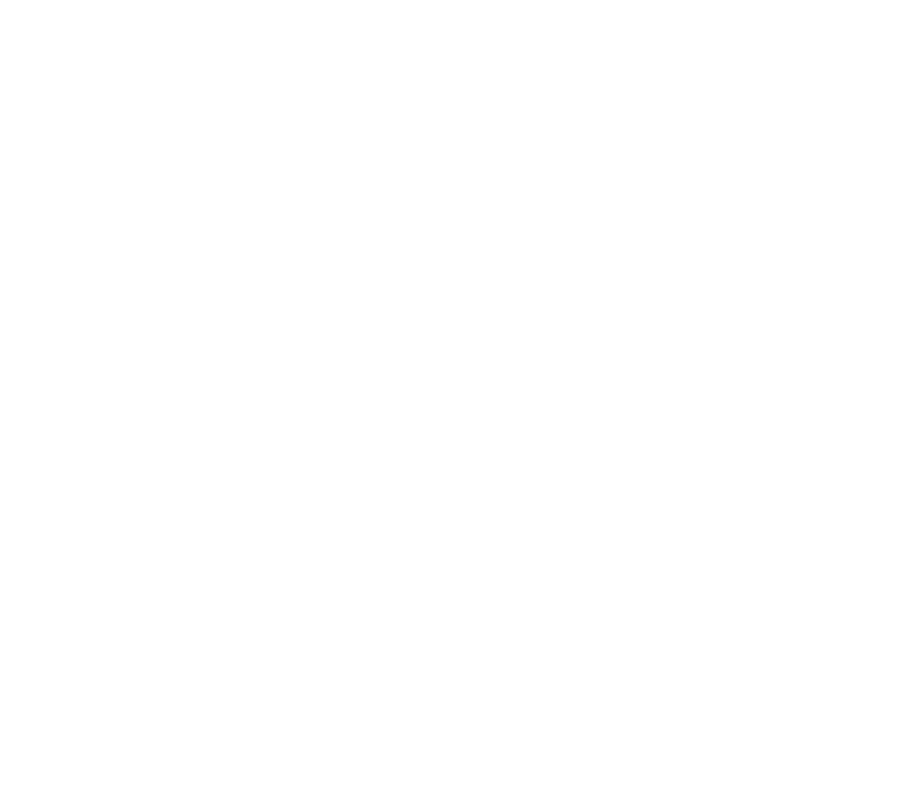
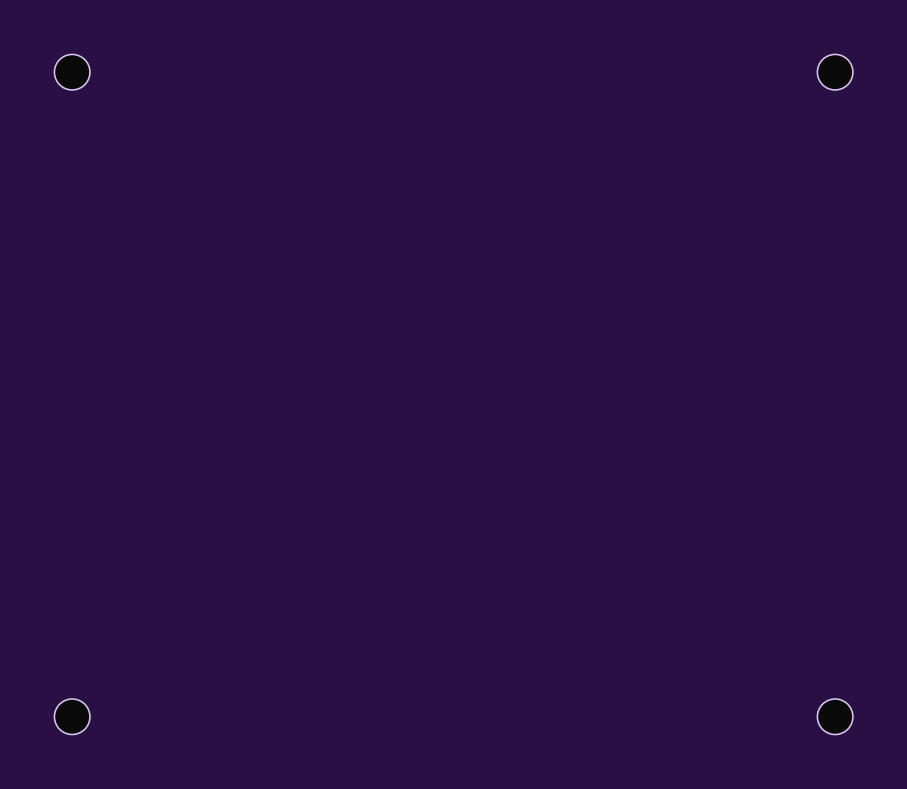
part: none -> (72, 72)
part: none -> (835, 72)
part: none -> (72, 716)
part: none -> (835, 716)

